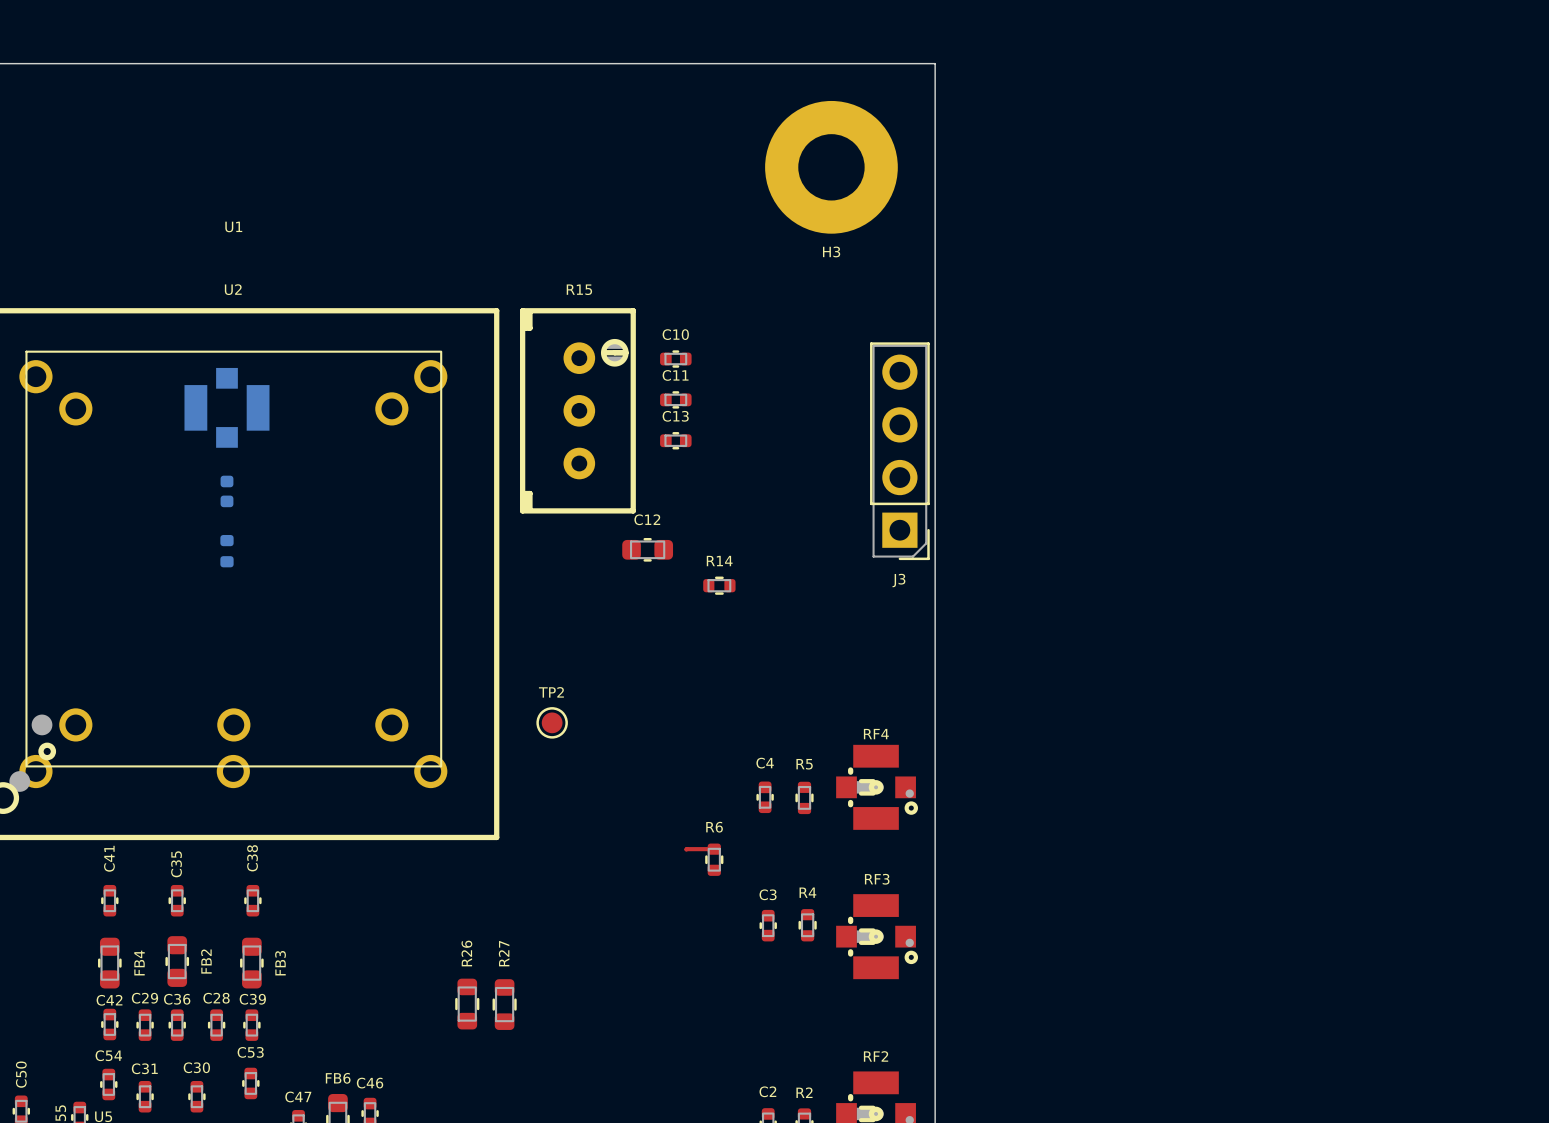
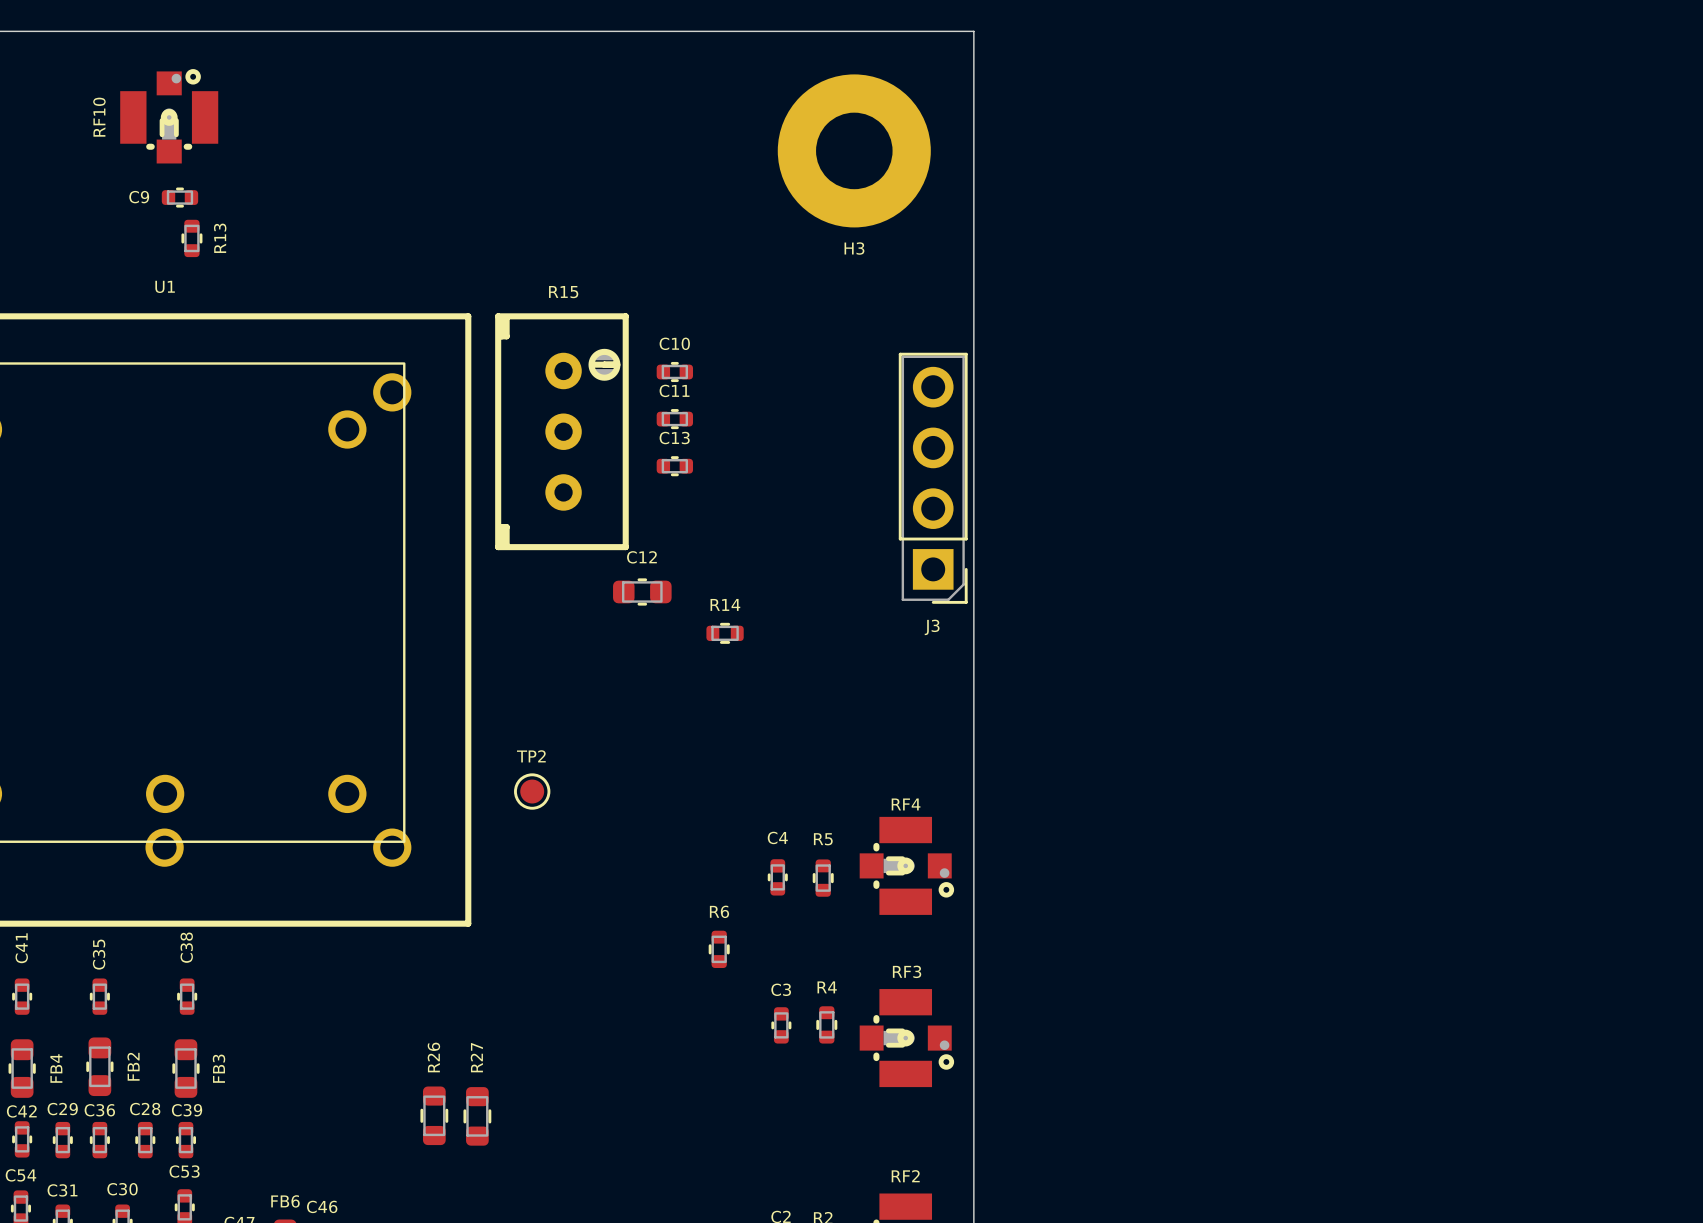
U1 name position: U1 (233, 226) -> U1 (165, 286)
U2 name: U2 (233, 289) -> none
RF10 side: bottom (226, 407) -> top (169, 116)
C9 side: bottom (226, 491) -> top (179, 197)
R13 side: bottom (226, 551) -> top (191, 238)
top track: (714, 849) (686, 849) -> none

